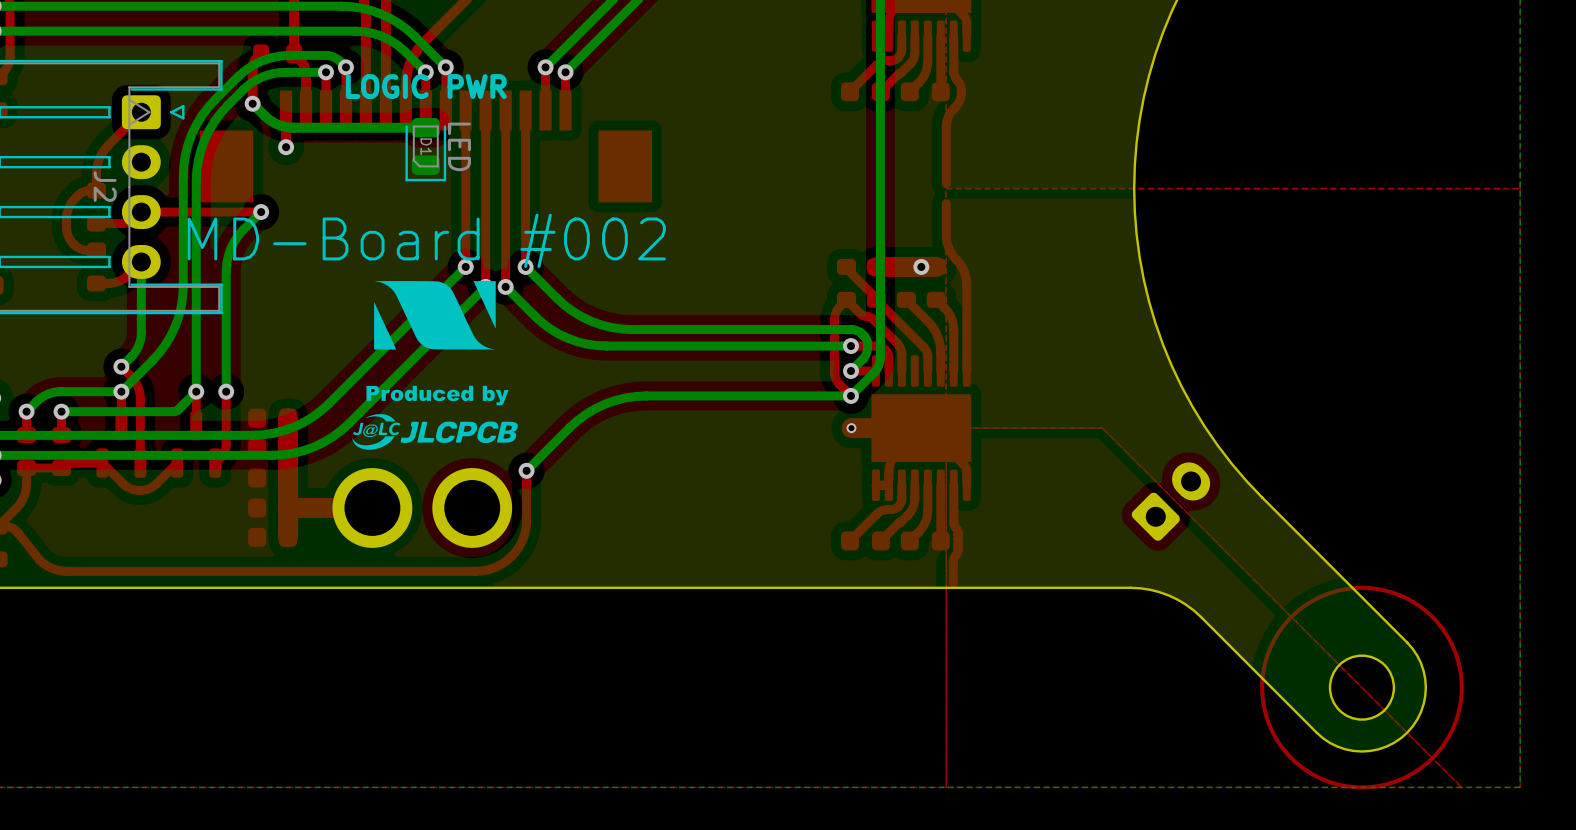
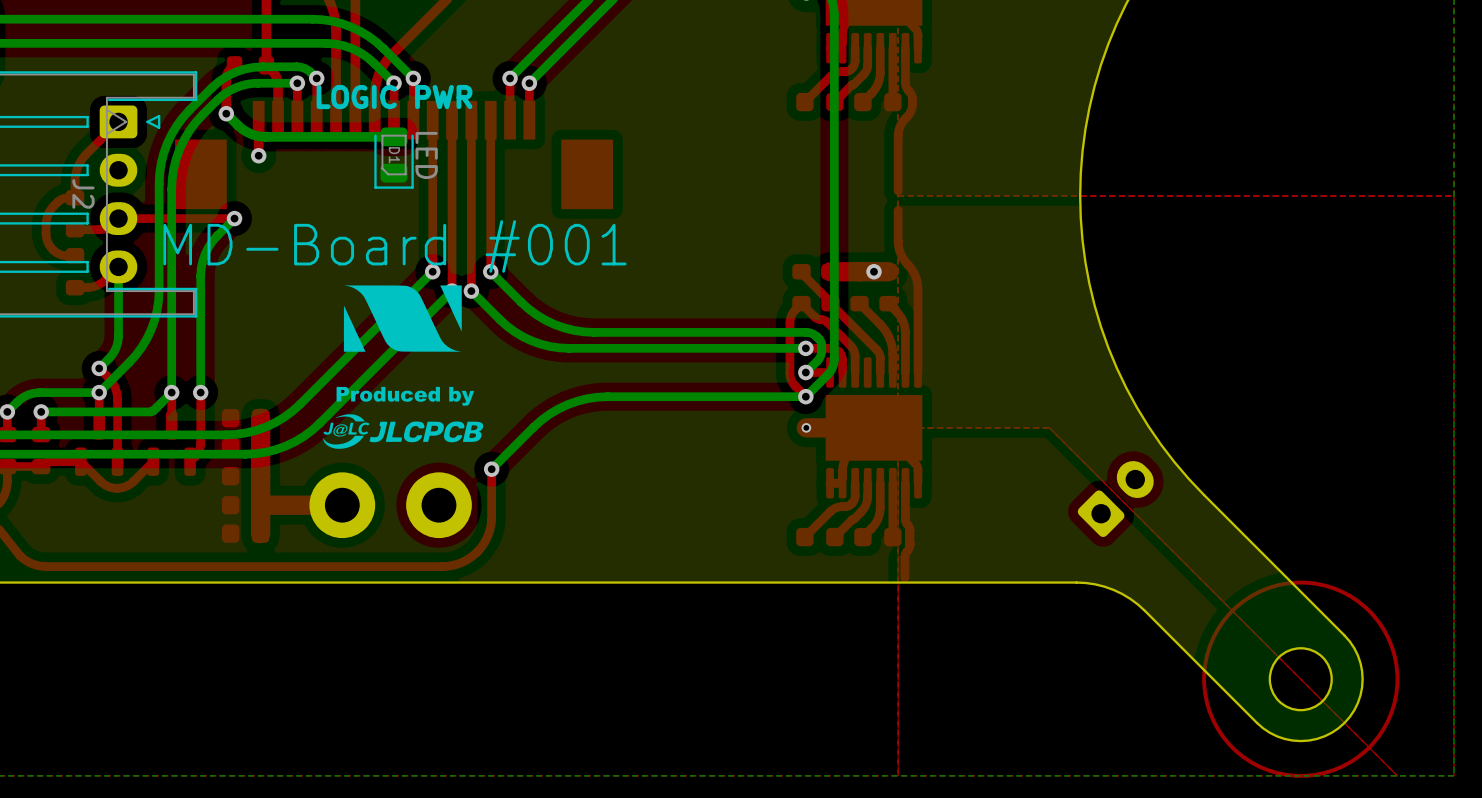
text: MD-Board #002 (426, 240) -> MD-Board #001 (394, 246)
part footprint: [332, 468, 513, 548] -> [309, 472, 472, 539]

